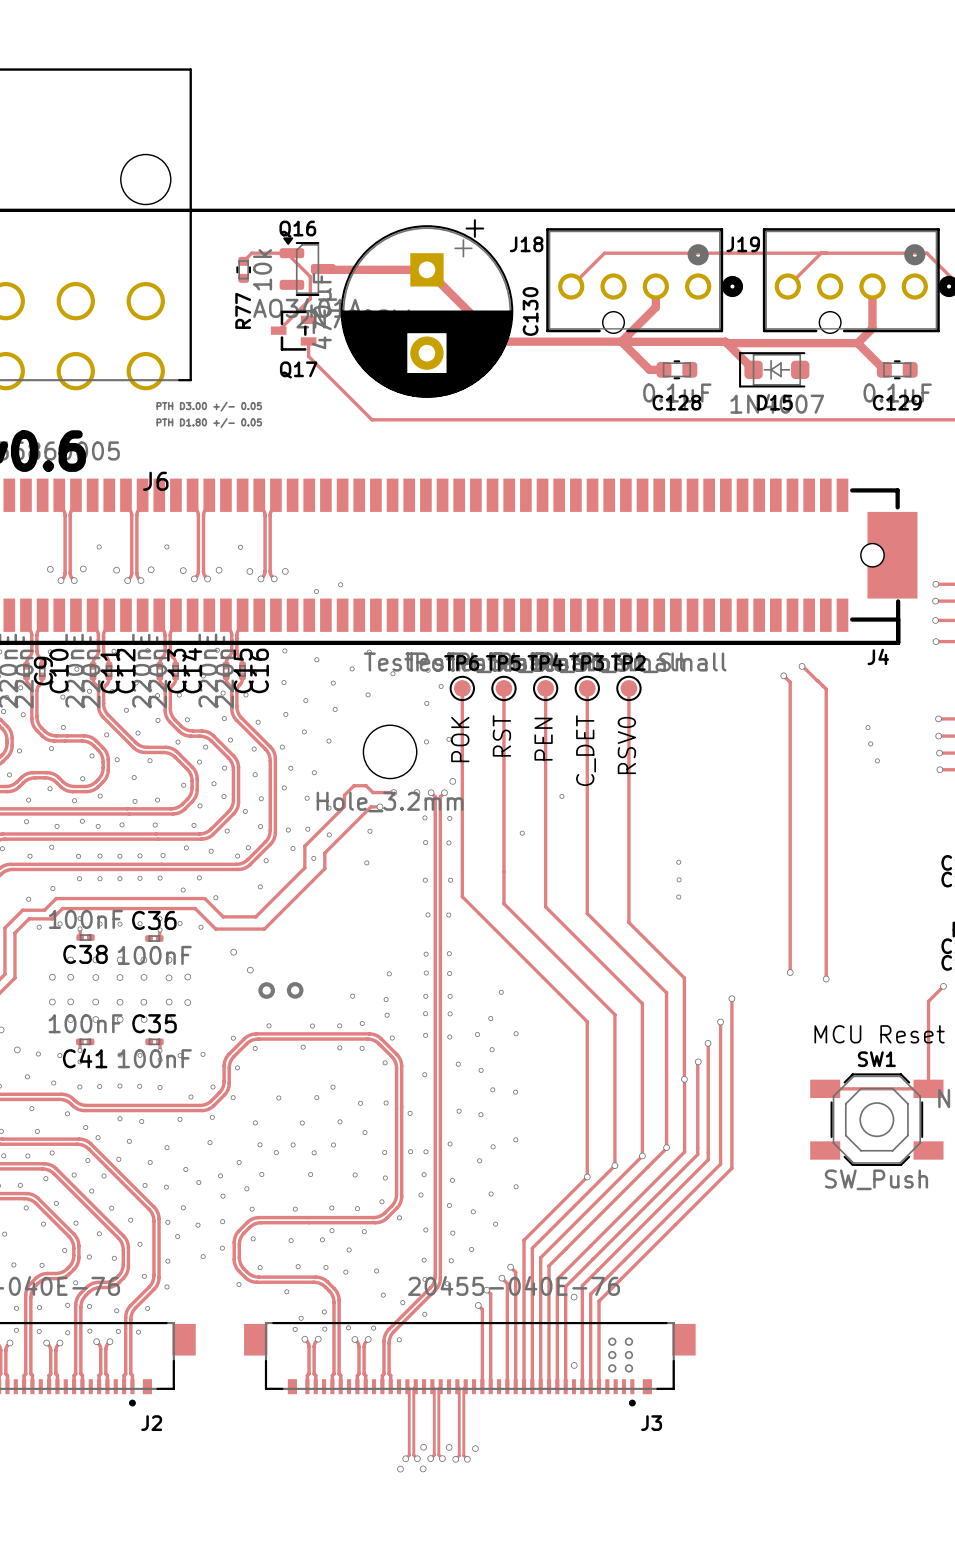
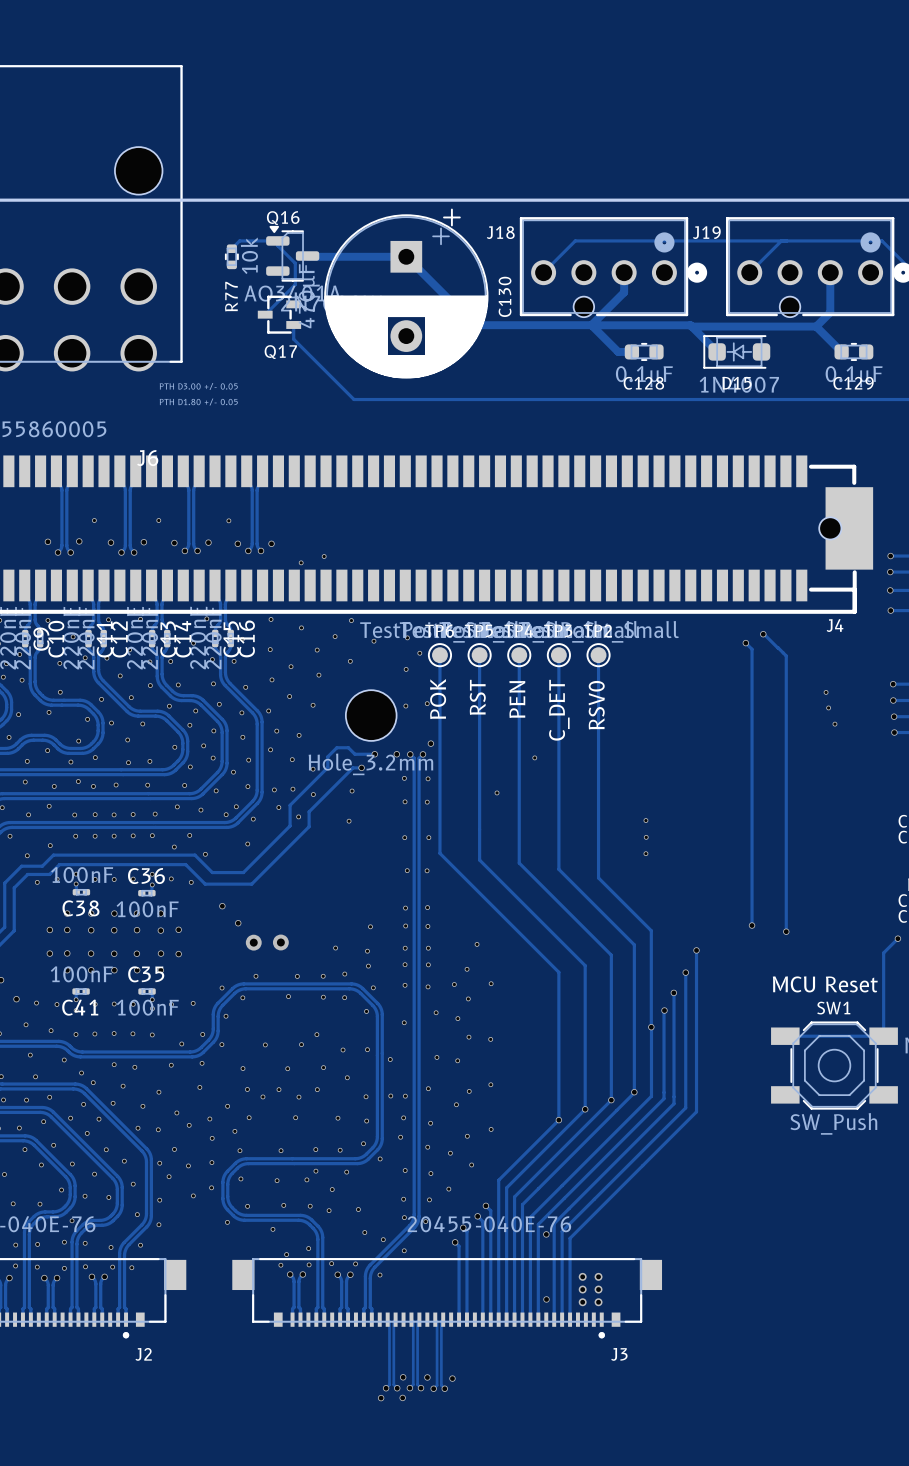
via: none -> (10, 836)

